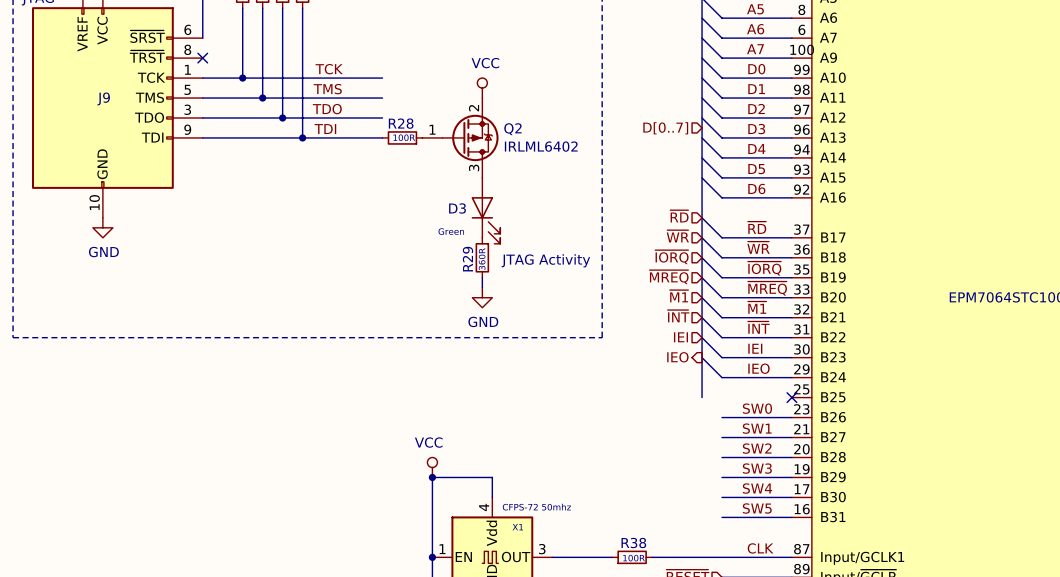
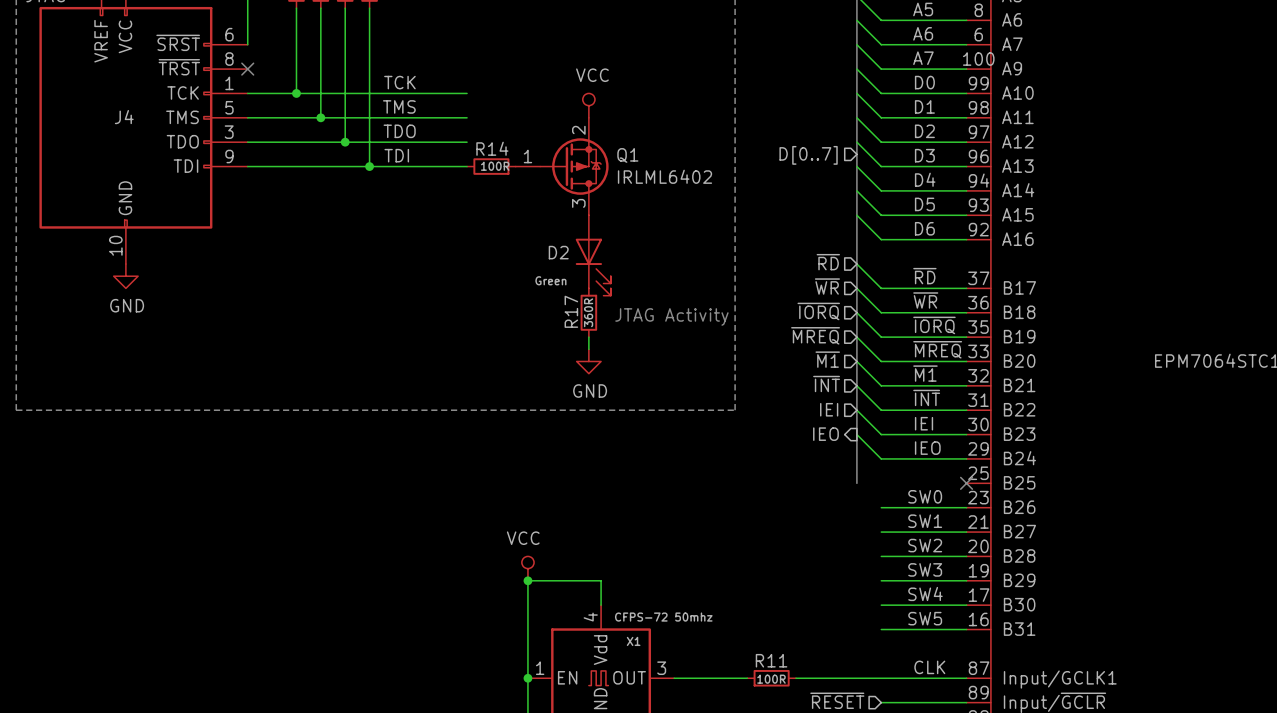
J9 name: J9 (103, 98) -> J4 (124, 117)
R28 name: R28 (401, 123) -> R14 (492, 148)
Q2 name: Q2 (512, 129) -> Q1 (627, 155)
D3 name: D3 (457, 208) -> D2 (558, 252)
R29 name: R29 (468, 259) -> R17 (571, 311)
R38 name: R38 (633, 543) -> R11 (771, 660)

